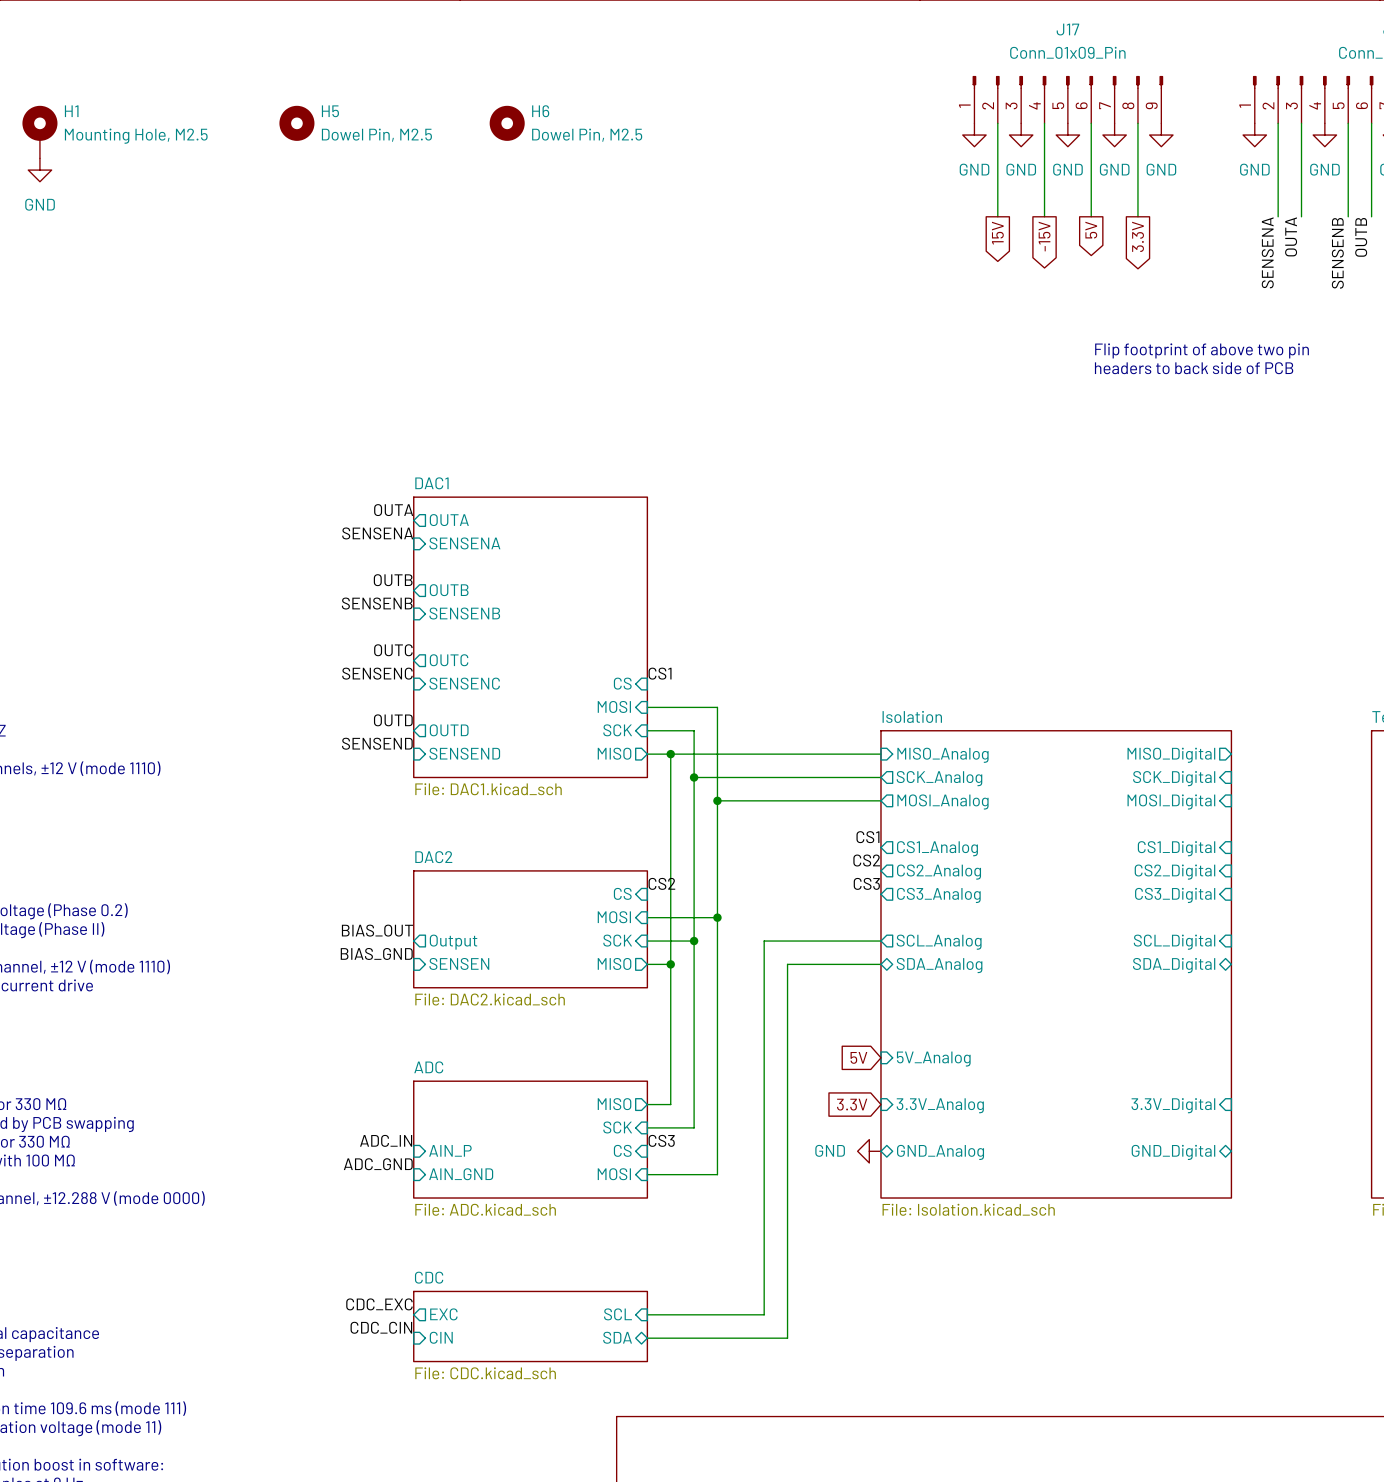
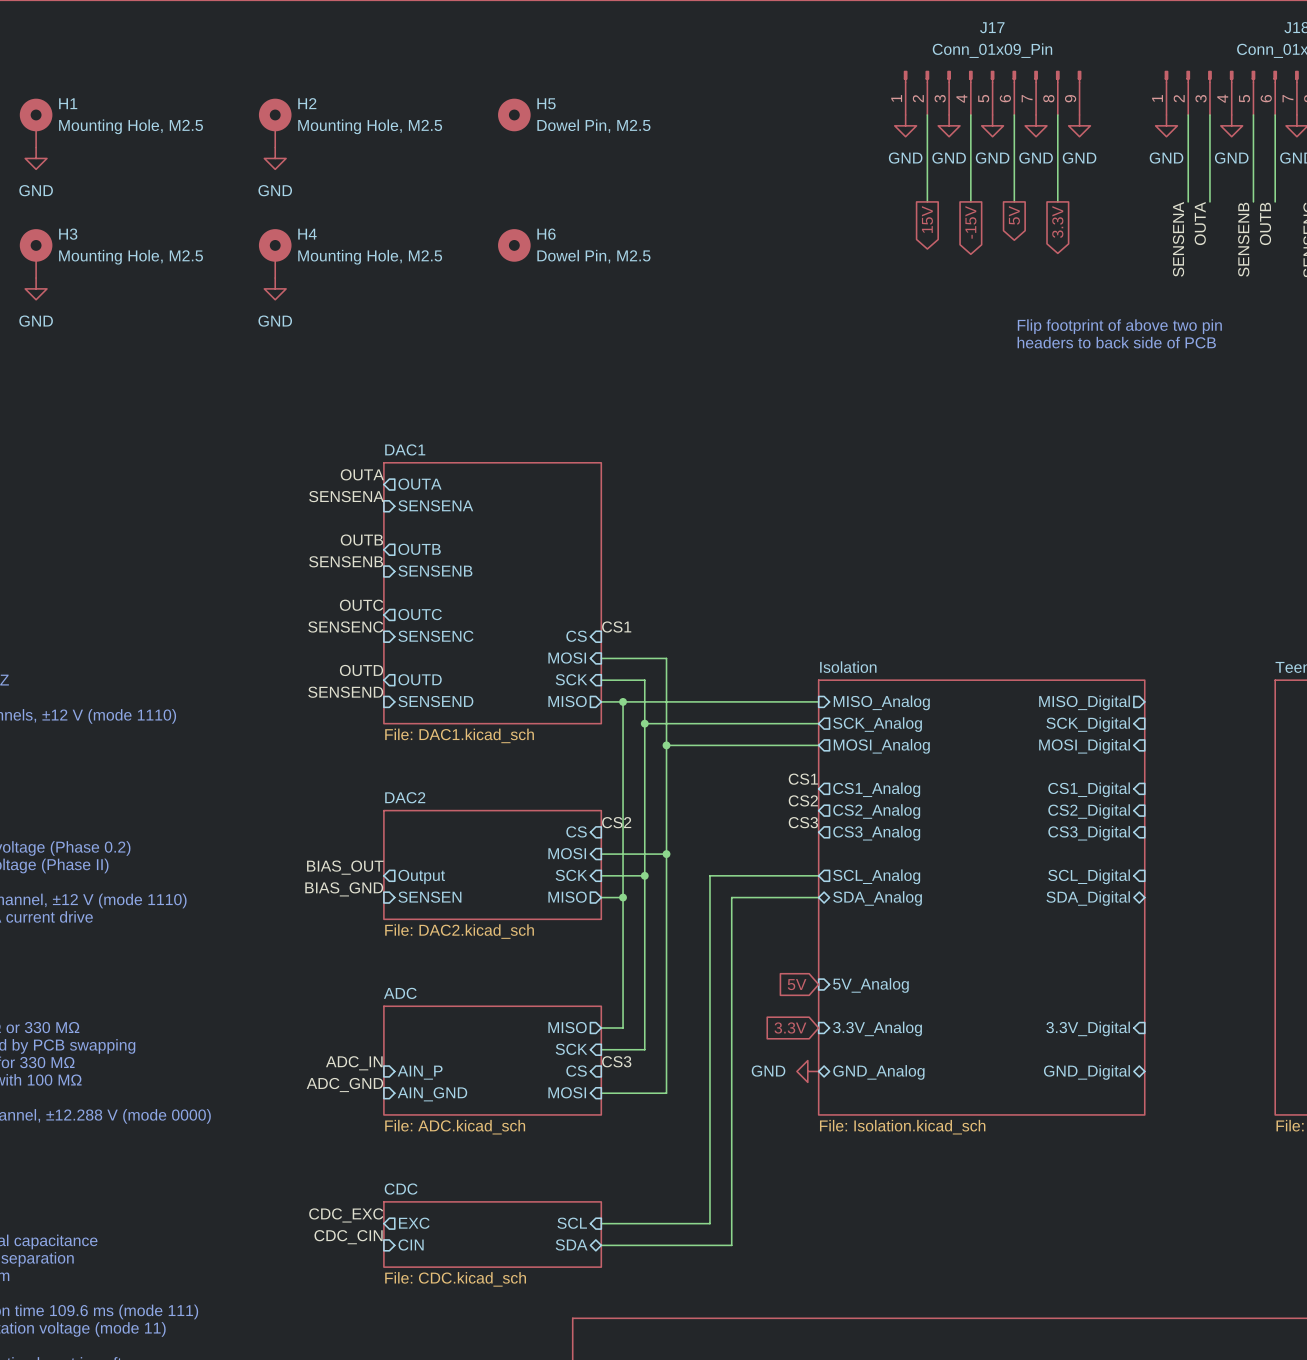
H5 position: (296, 123) -> (514, 114)
H6 position: (507, 123) -> (514, 245)
H2: none -> Mounting Hole, M2.5 (275, 123)
power symbol: none -> GND (275, 158)
H3: none -> Mounting Hole, M2.5 (36, 253)
H4: none -> Mounting Hole, M2.5 (275, 253)
power symbol: none -> GND (36, 288)
power symbol: none -> GND (275, 288)

